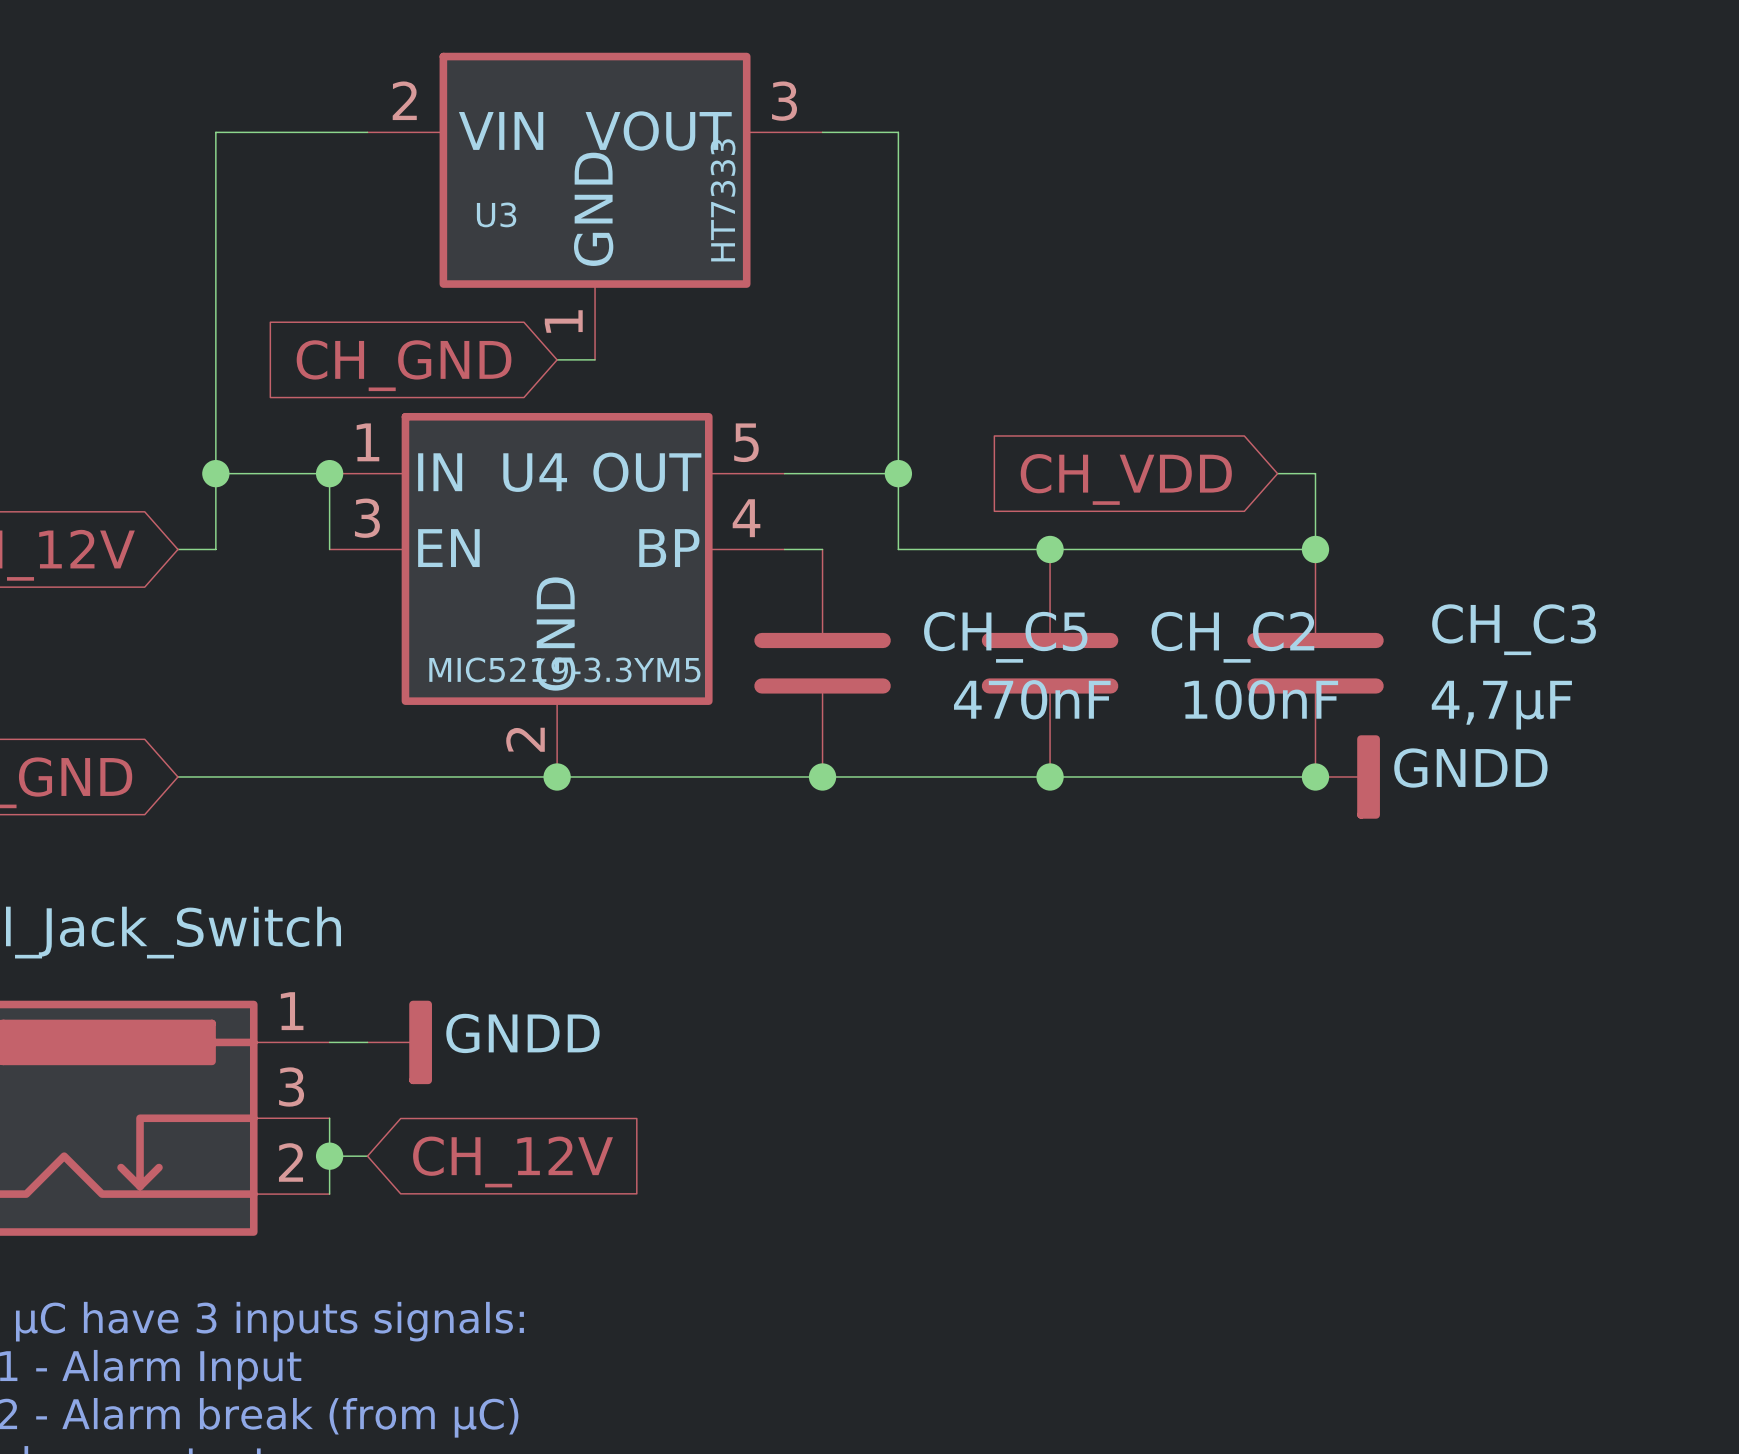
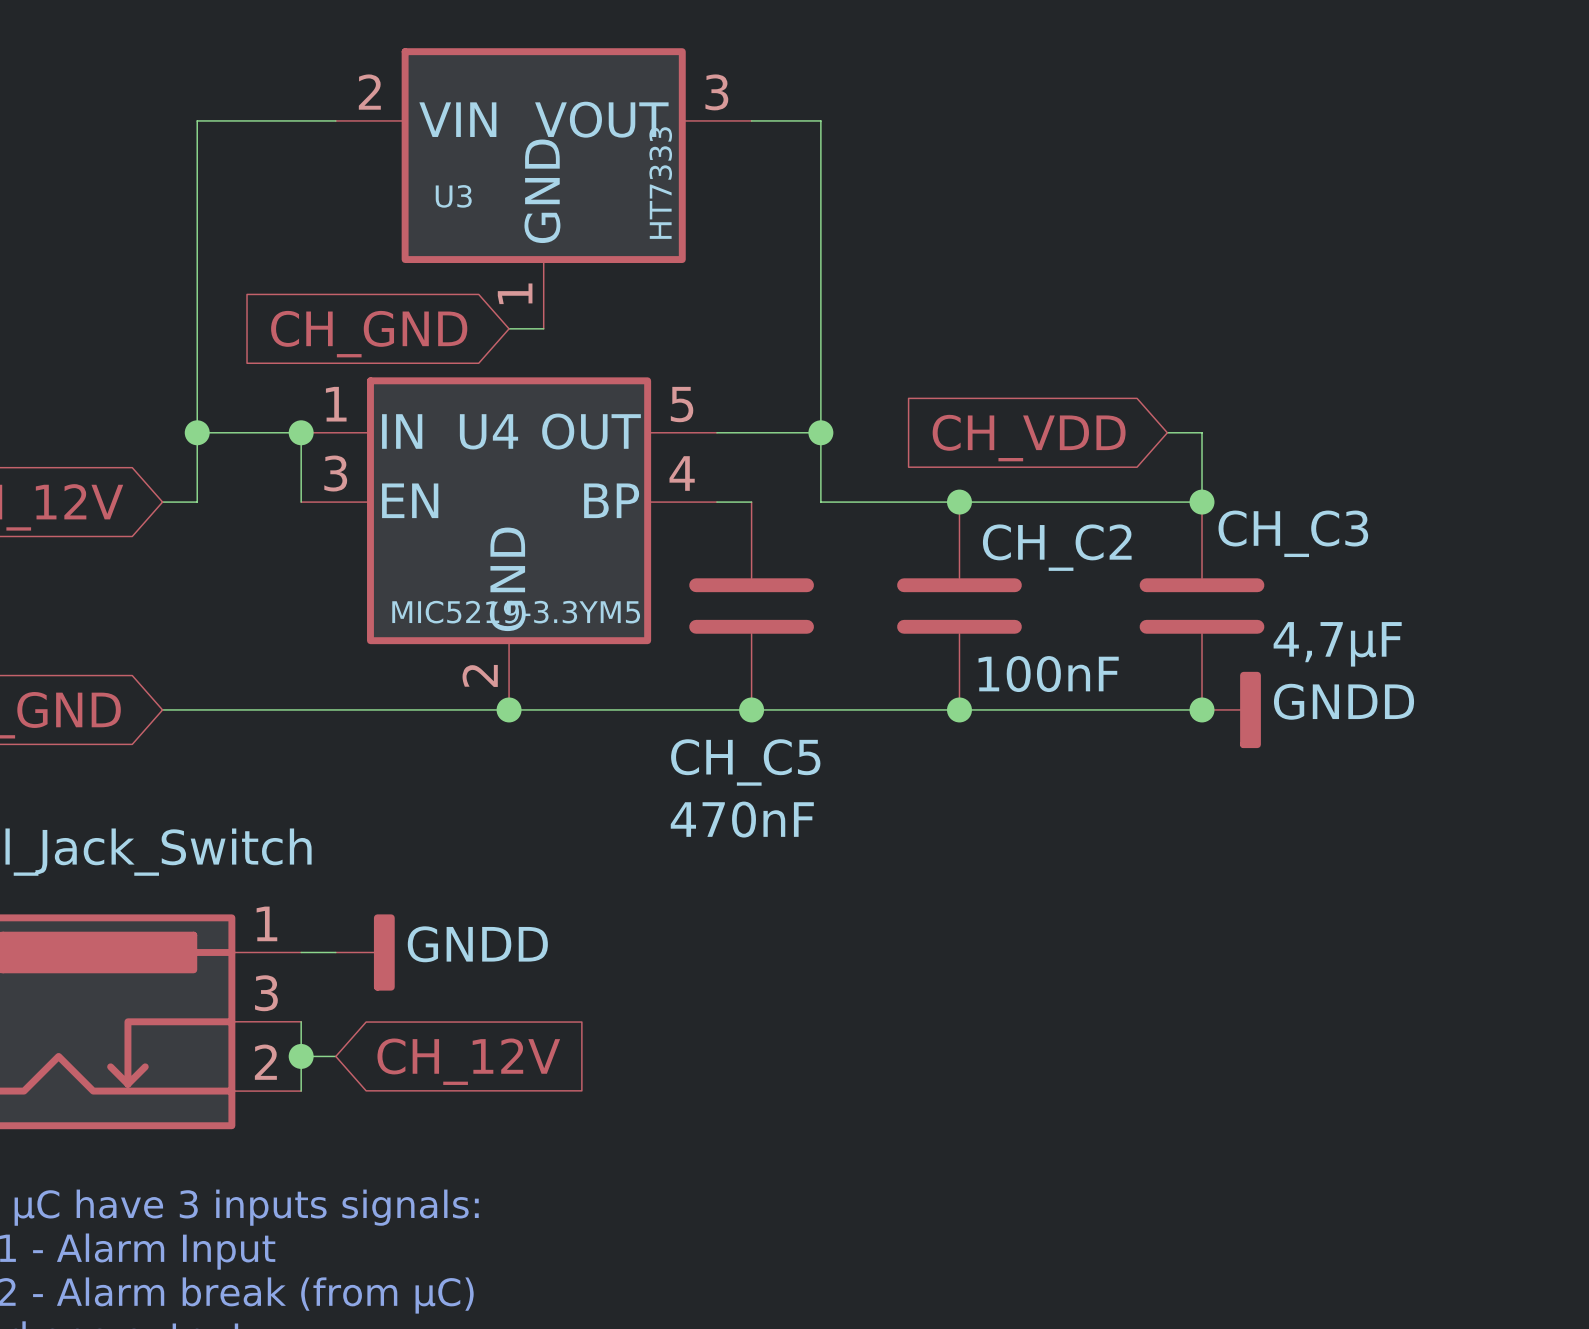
CH_C3 name position: CH_C3 (1514, 629) -> CH_C3 (1293, 533)
CH_C5 name position: CH_C5 (1005, 637) -> CH_C5 (745, 762)
CH_C2 name position: CH_C2 (1232, 637) -> CH_C2 (1057, 547)
CH_C5 value position: 470nF (1032, 699) -> 470nF (742, 819)
CH_C2 value position: 100nF (1261, 699) -> 100nF (1048, 674)
CH_C3 value position: 4,7µF (1501, 705) -> 4,7µF (1337, 644)

